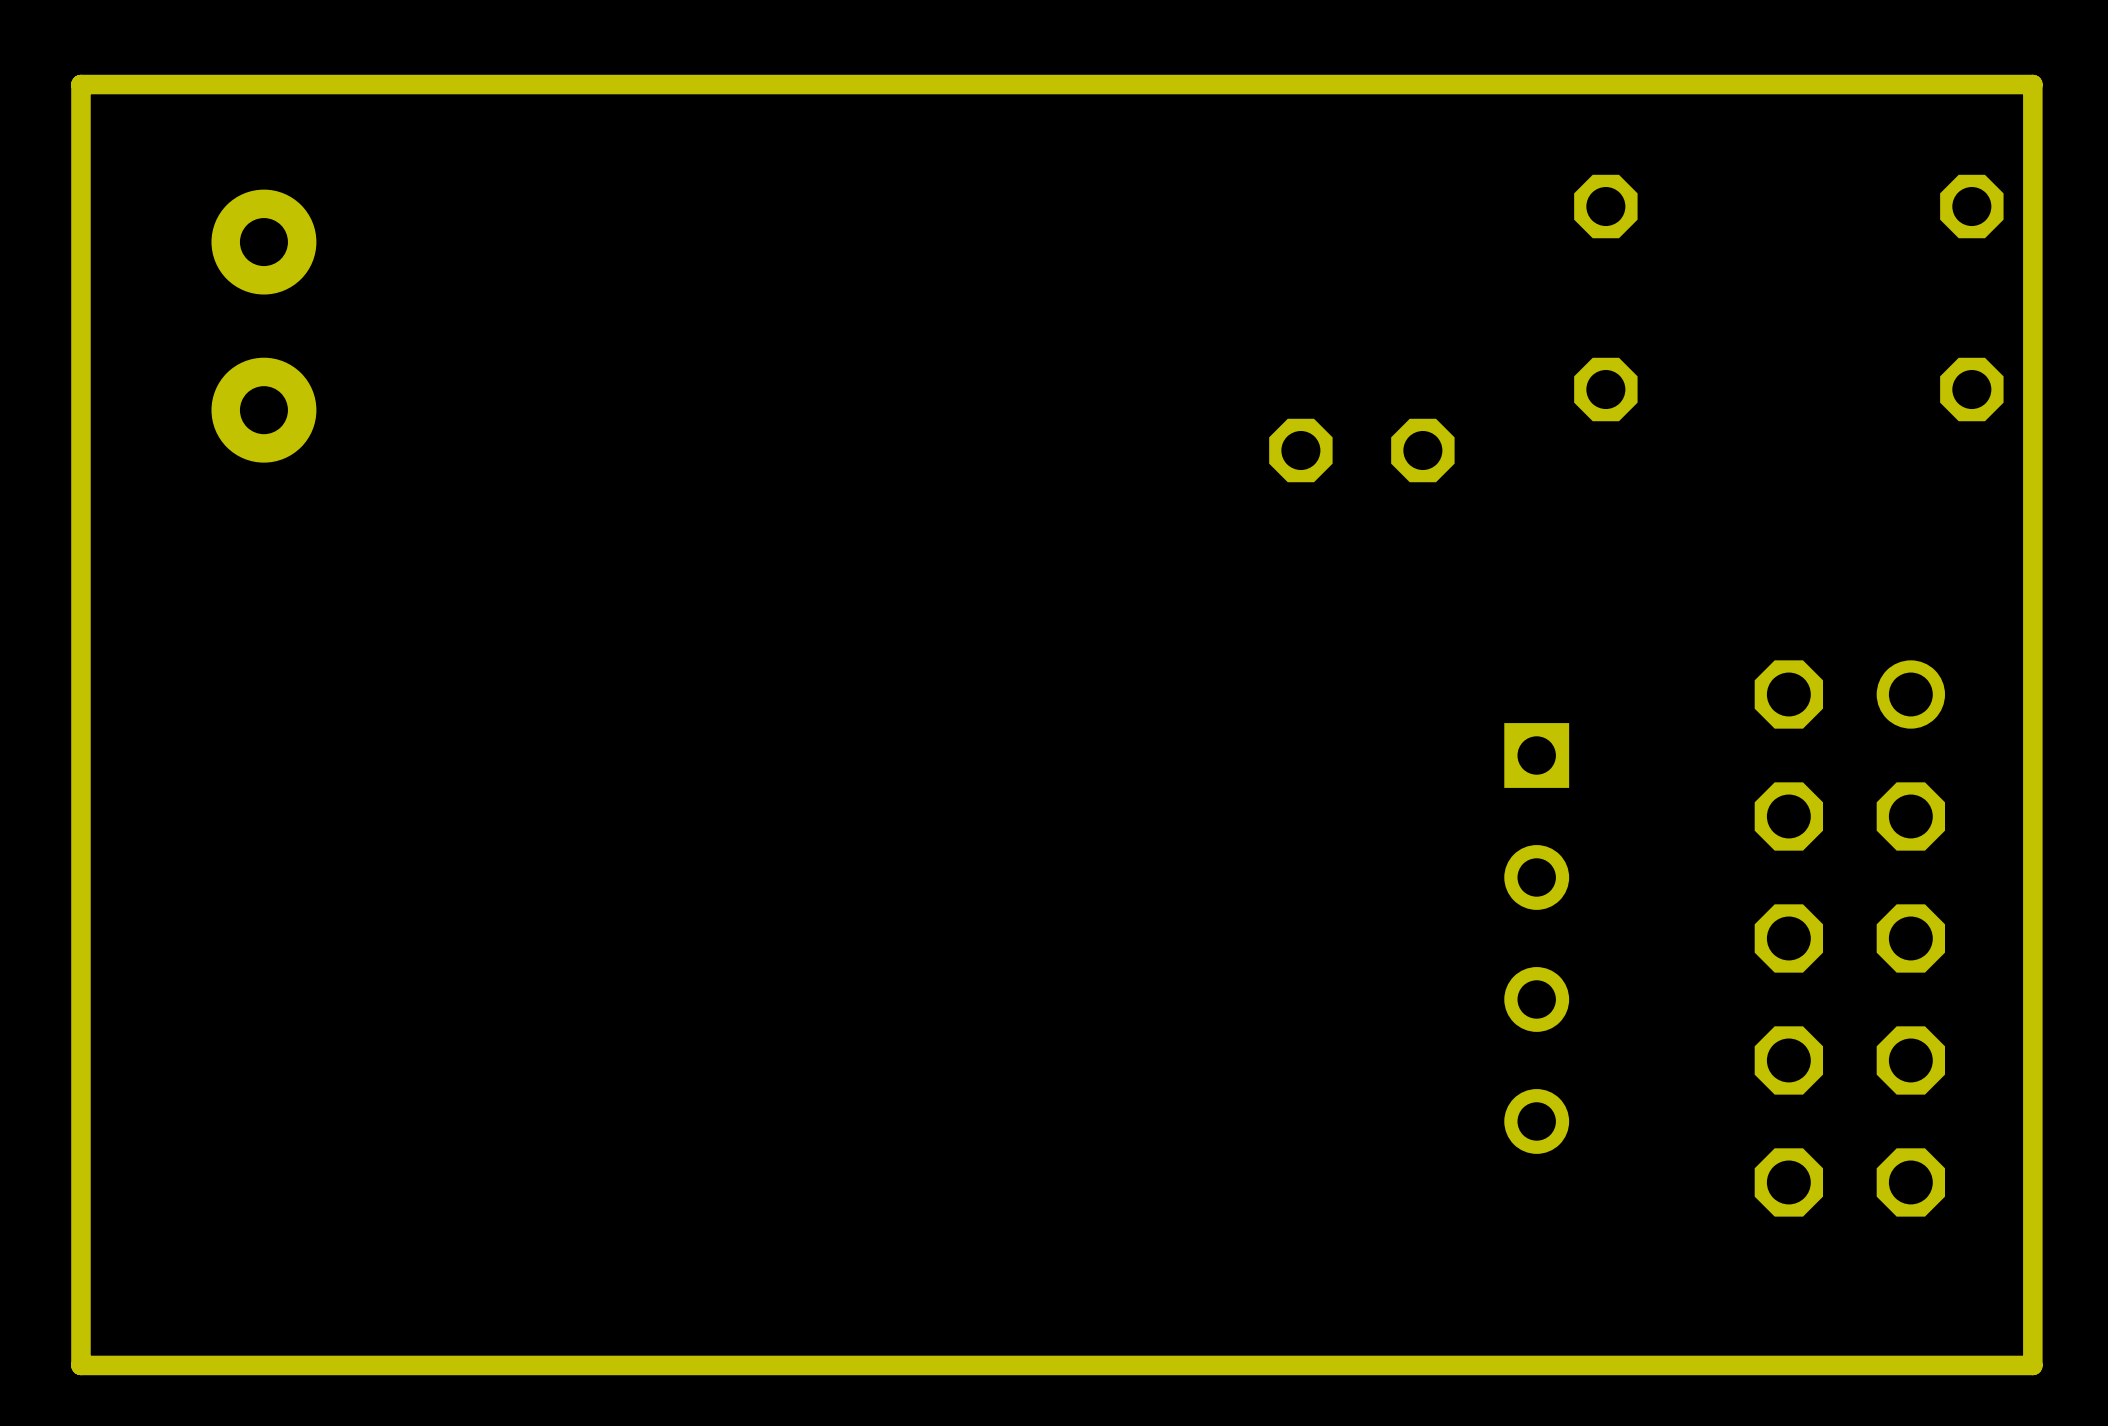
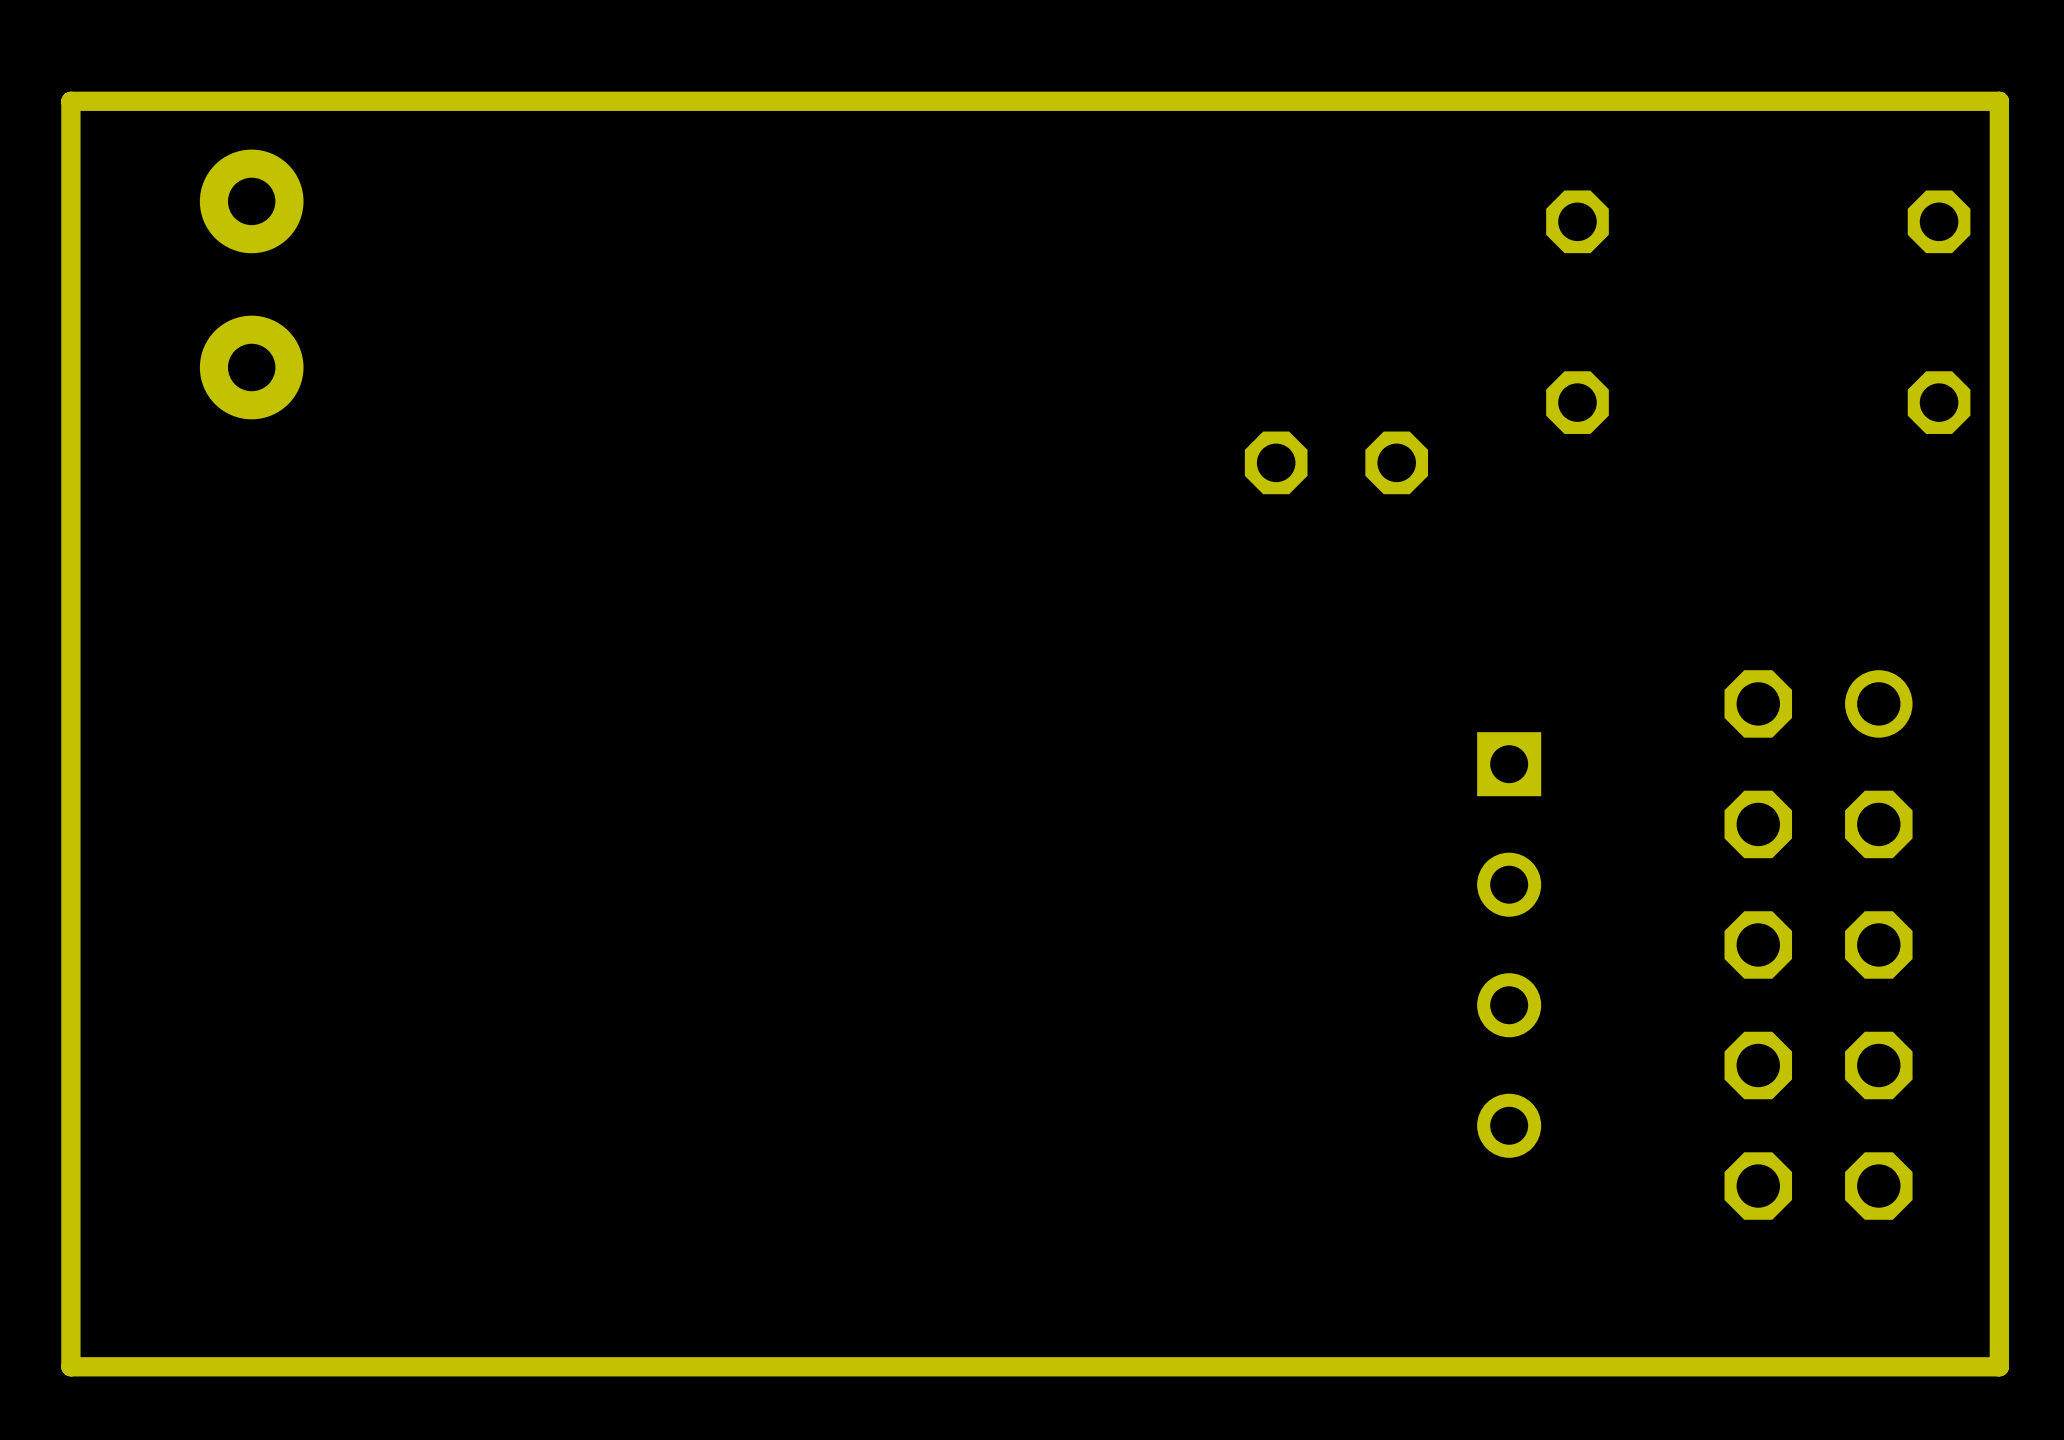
part position: (263, 326) -> (251, 284)

